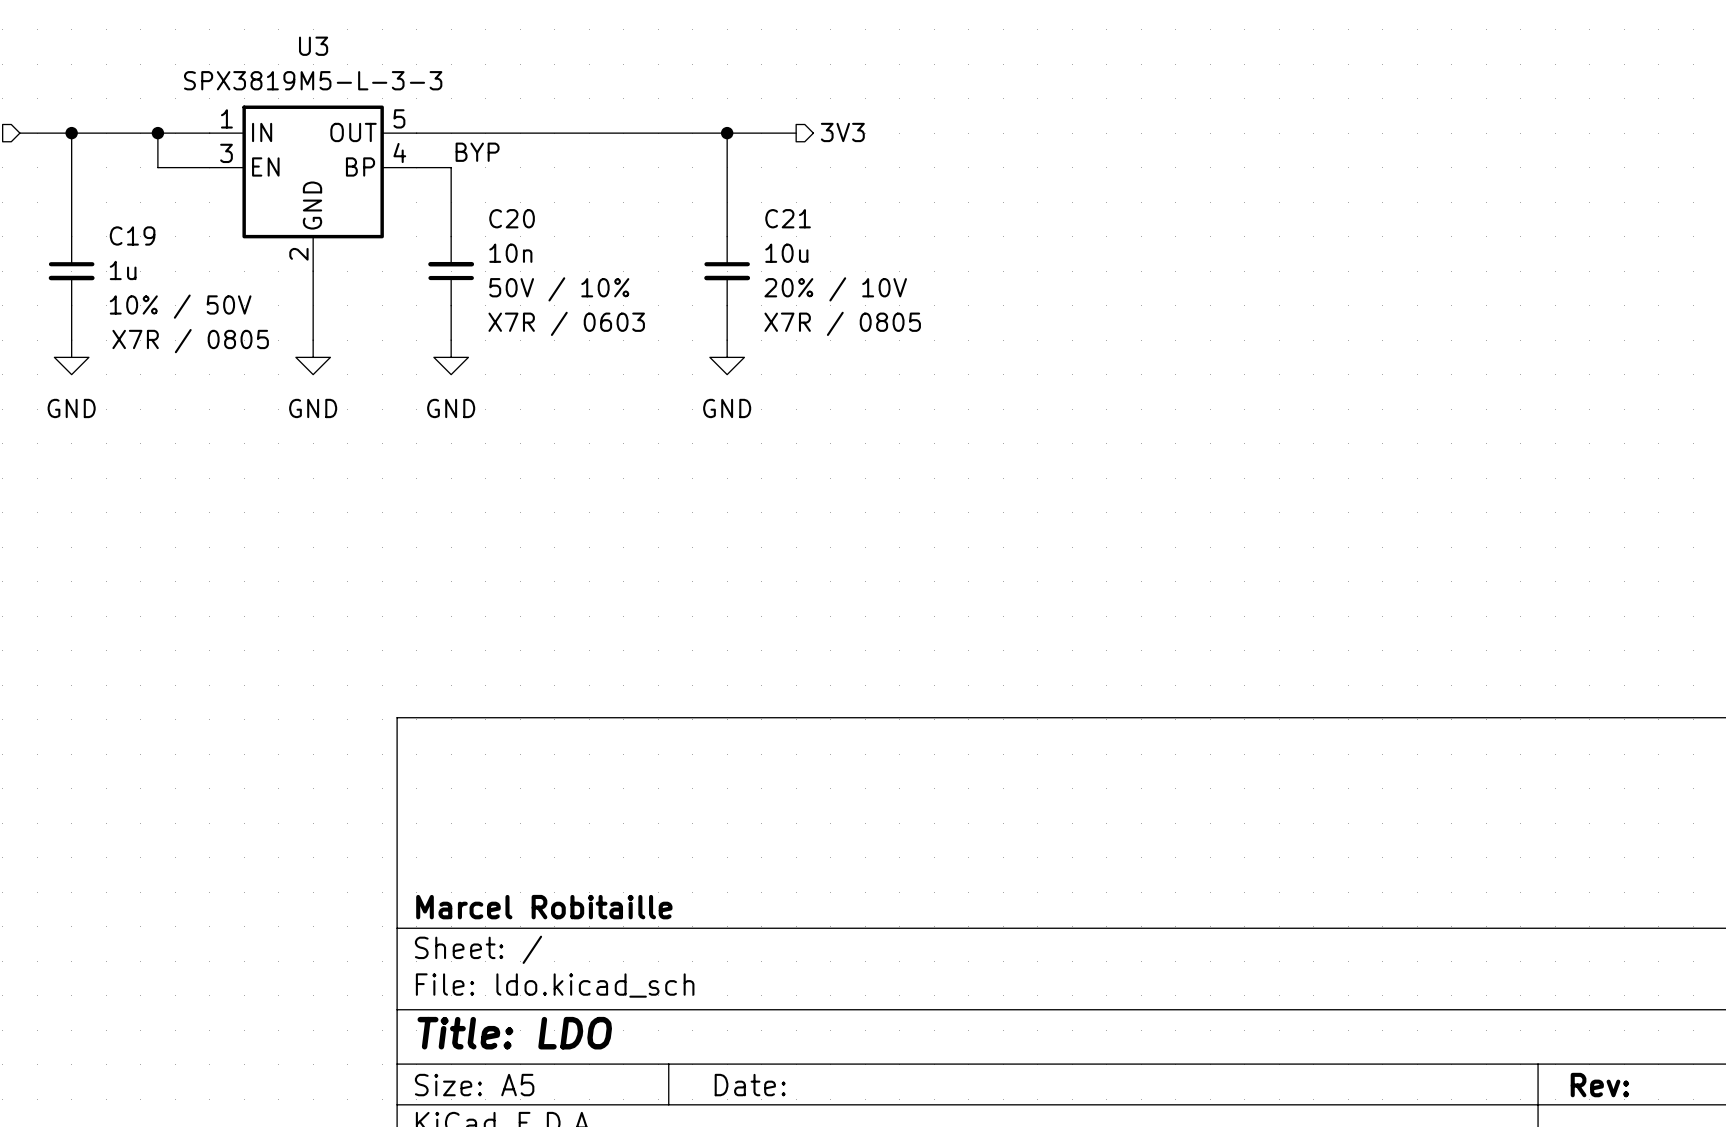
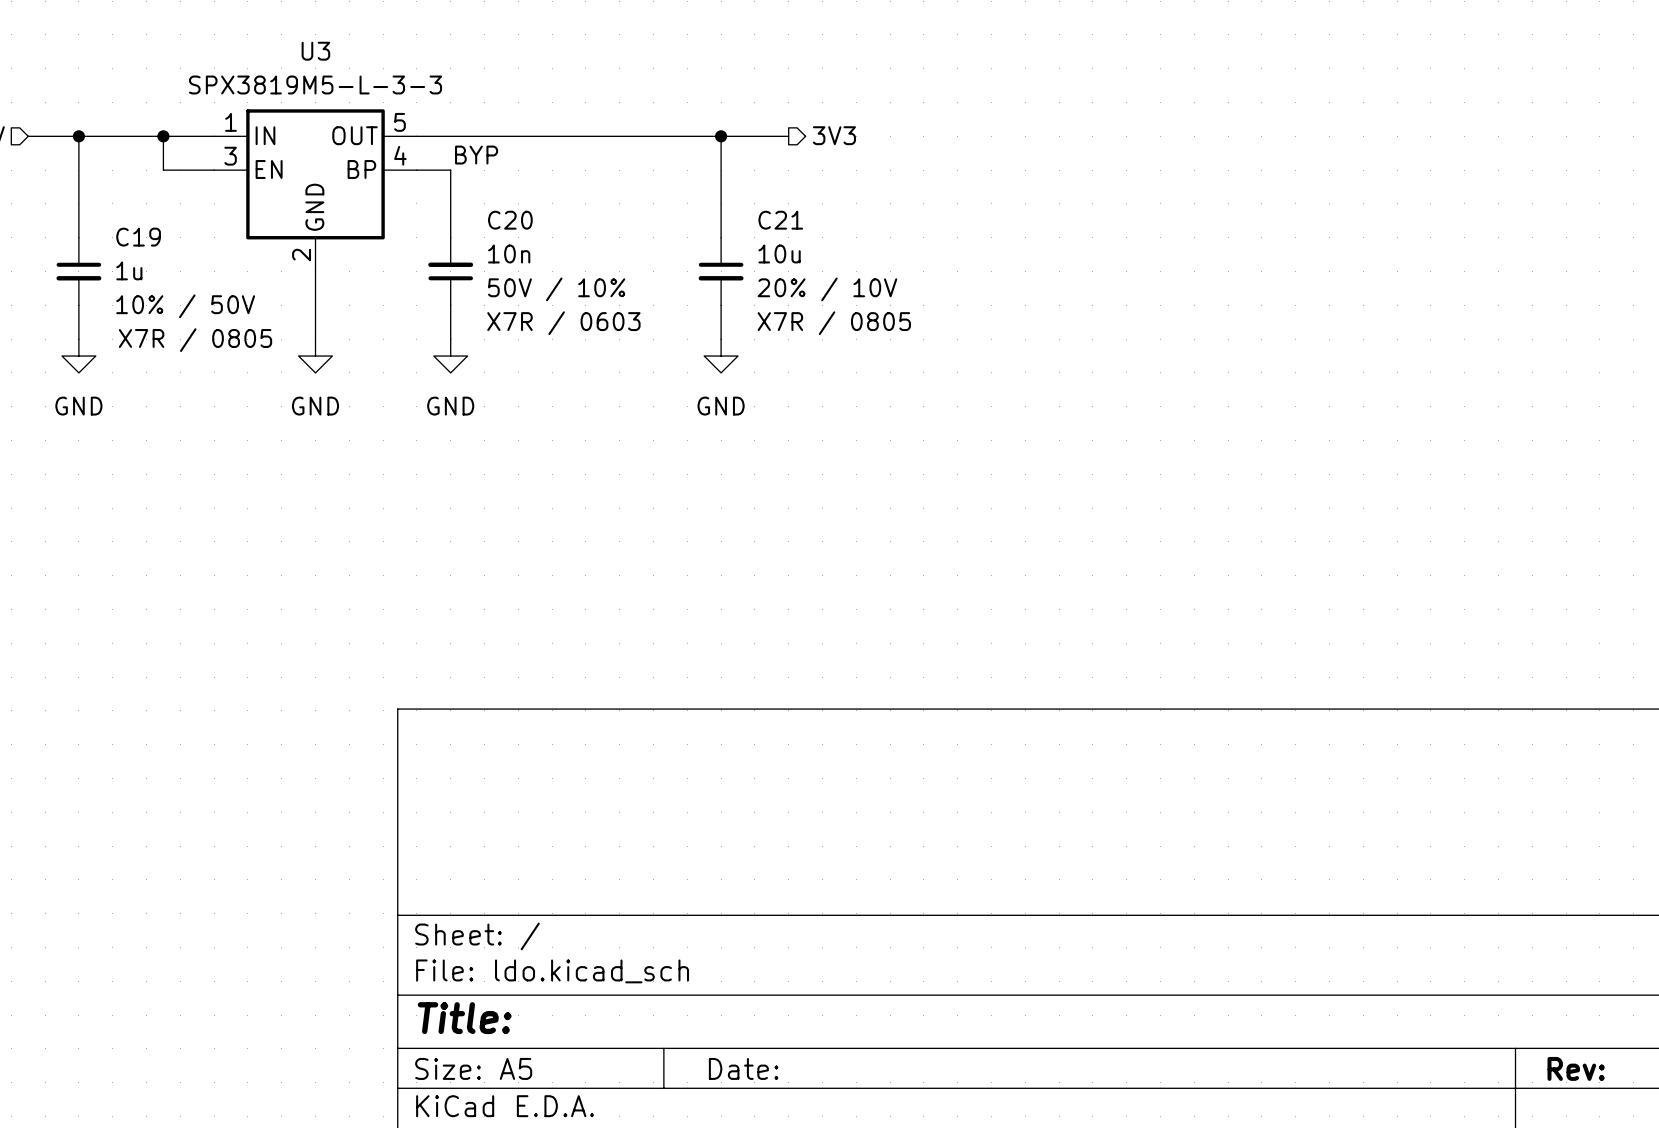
title block: Marcel Robitaille (544, 907) -> none
title block: Title: LDO (514, 1033) -> Title: (464, 1018)

